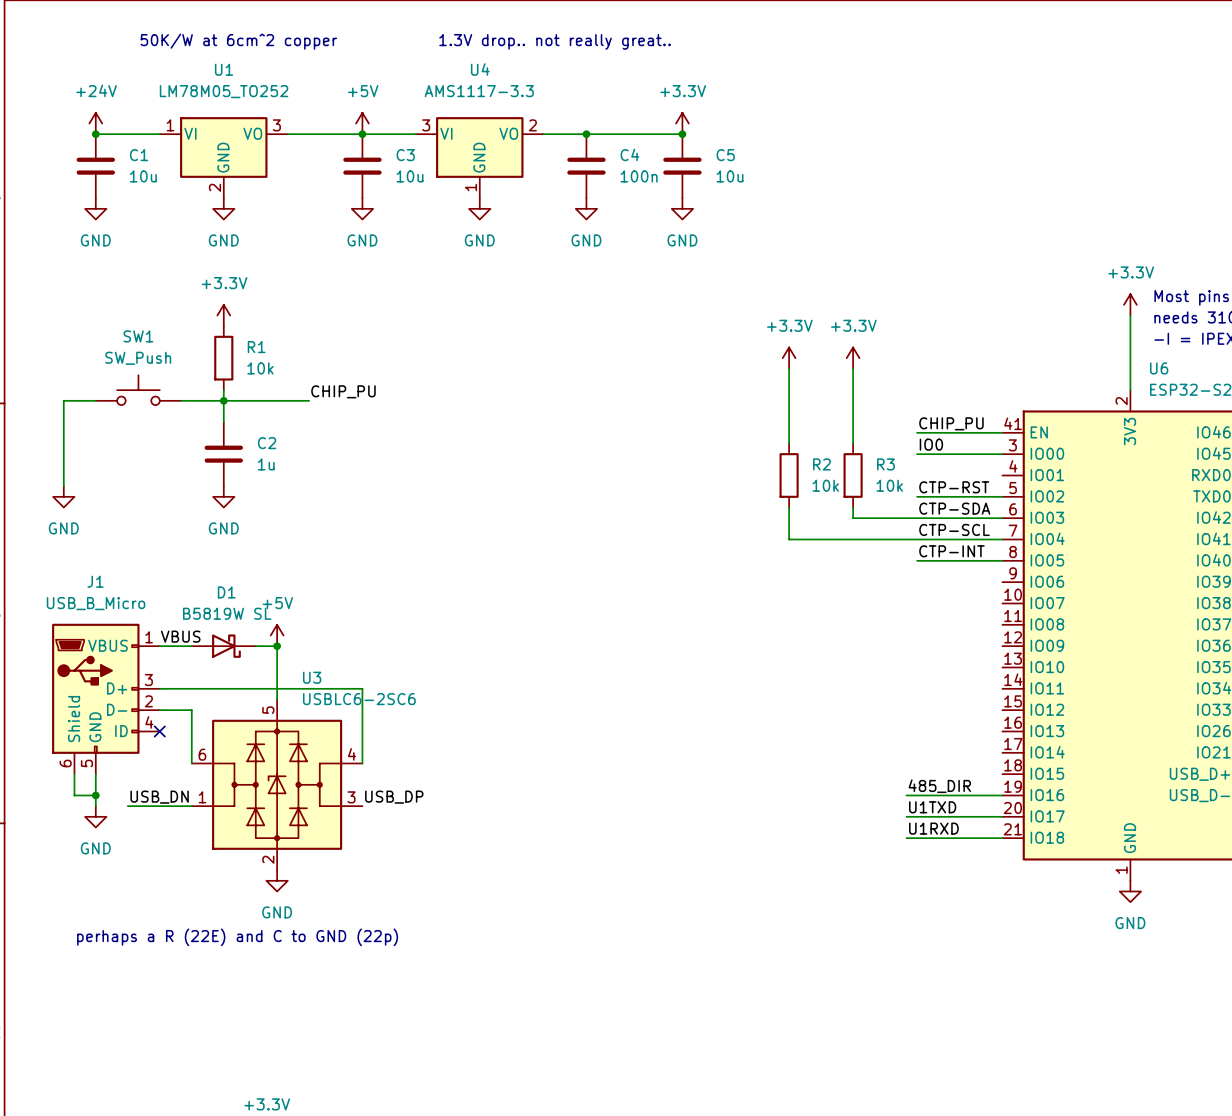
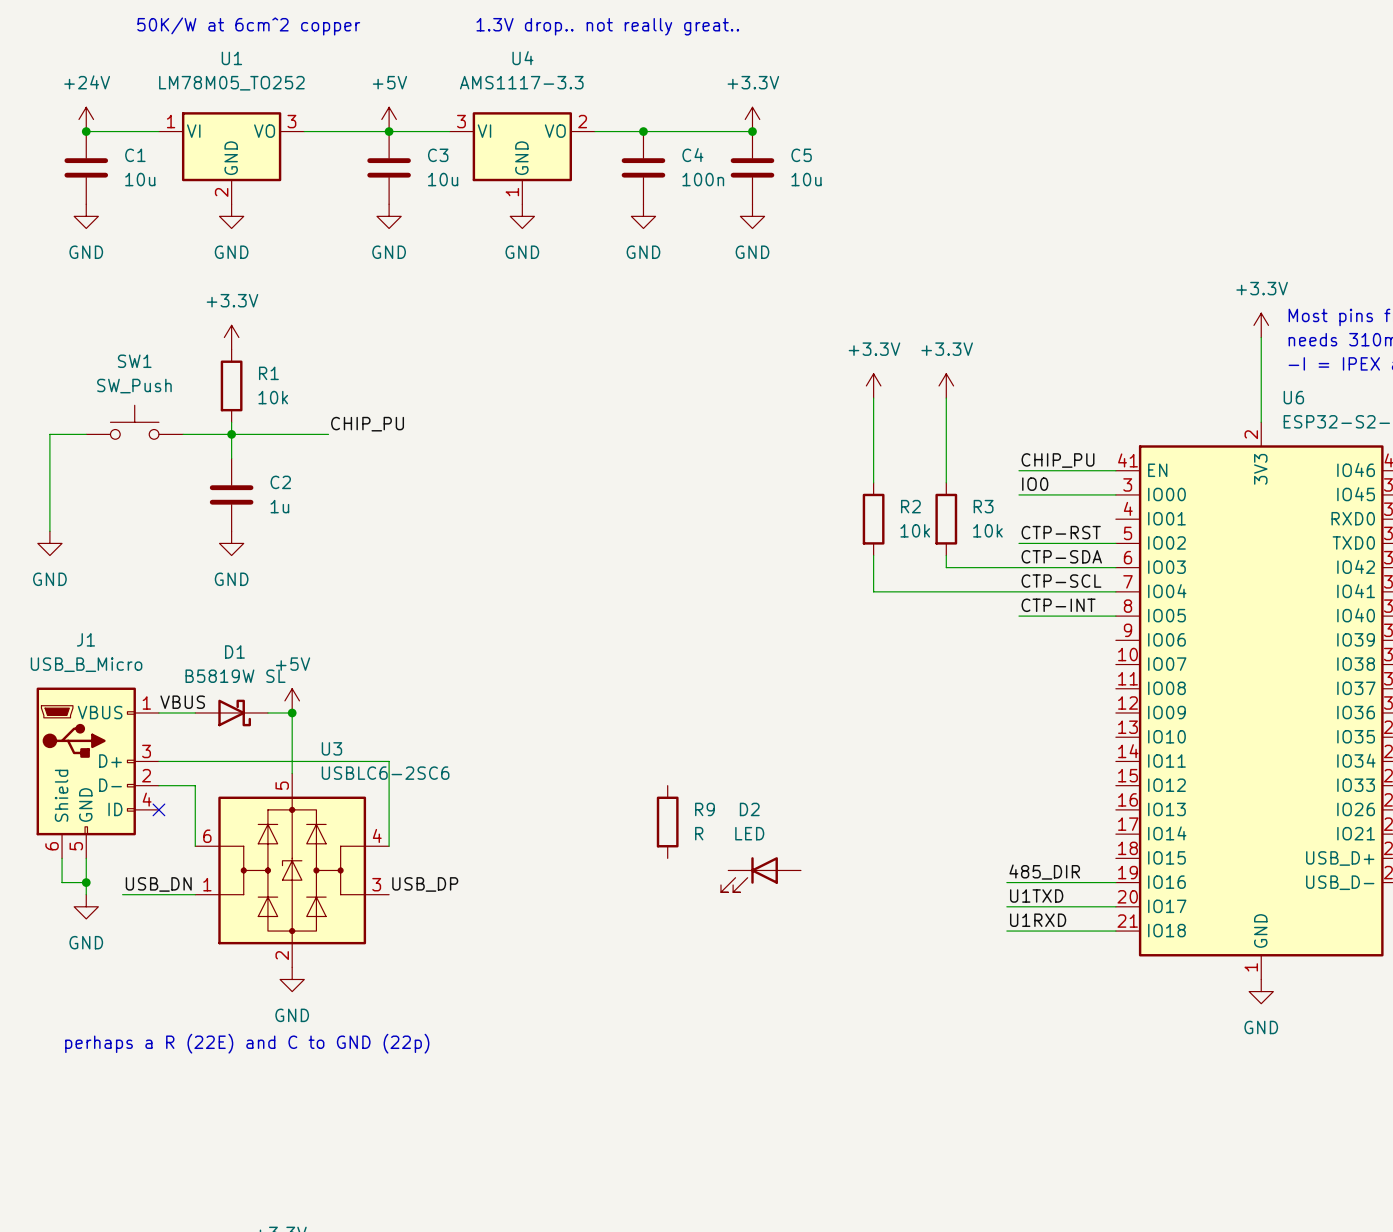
R9: none -> R (667, 822)
D2: none -> LED (760, 874)

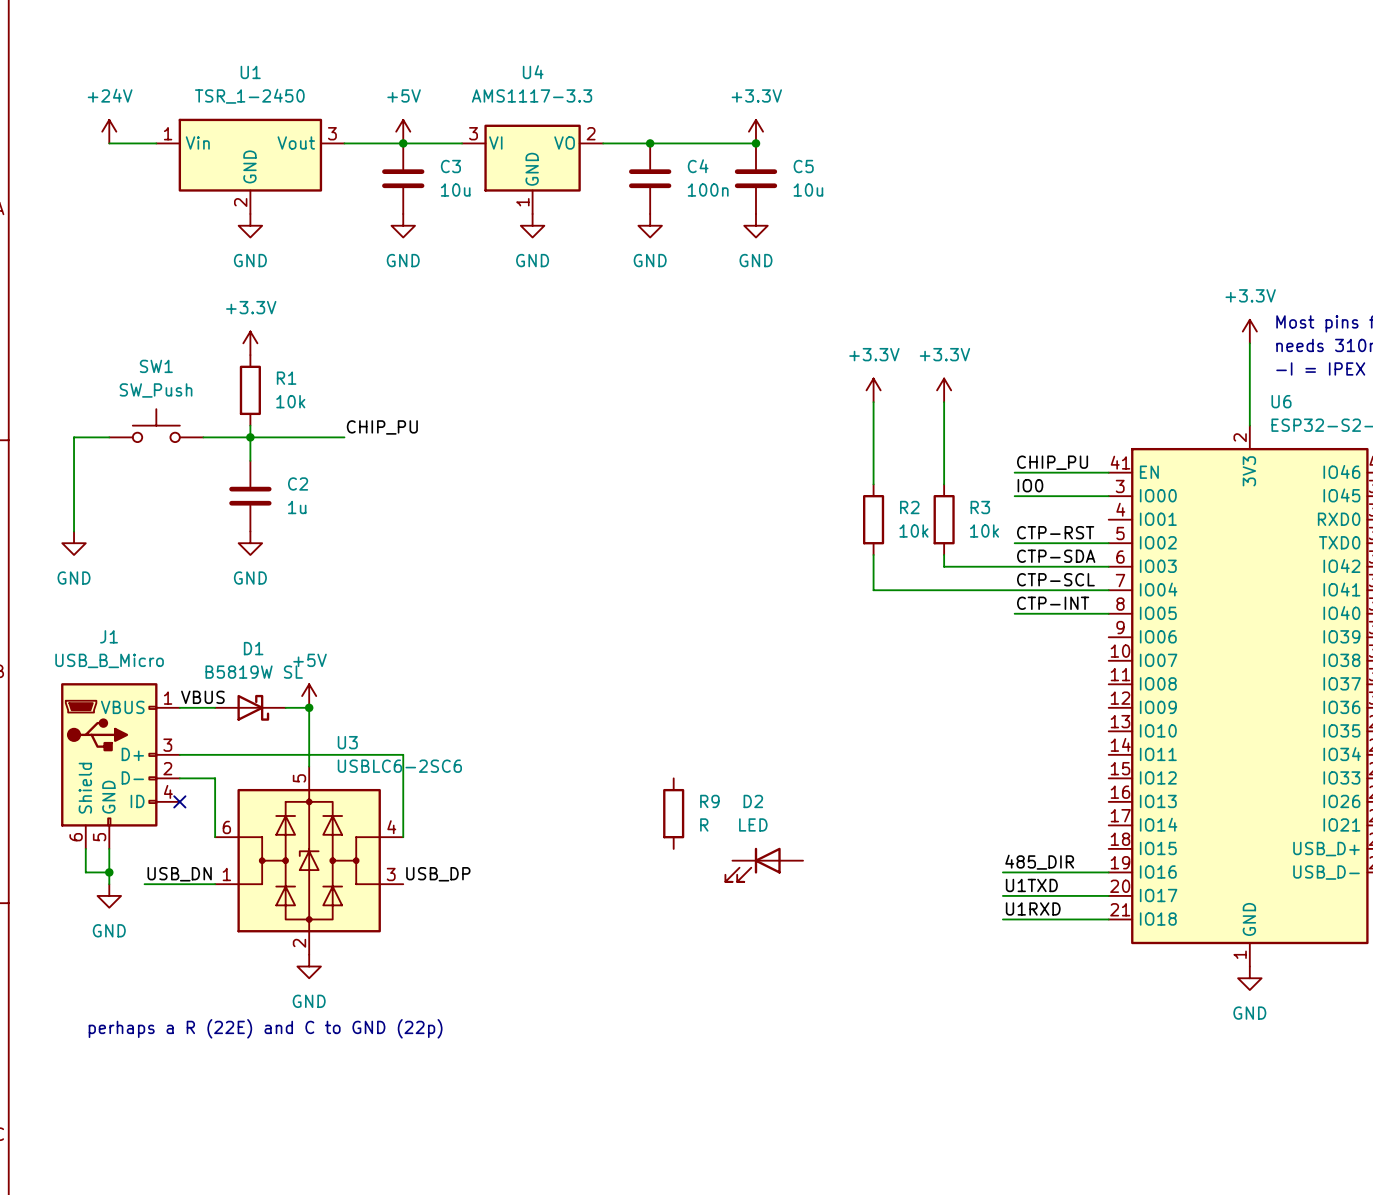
text: 50K/W at 6cm^2 copper (248, 26) -> none
text: 1.3V drop.. not really great.. (607, 26) -> none
U1 value: LM78M05_TO252 (231, 83) -> TSR_1-2450 (249, 96)
U1 symbol: [158, 112, 305, 205] -> [156, 118, 345, 214]
junction: (86, 131) -> none
C1: 10u (86, 167) -> none
power symbol: GND (86, 216) -> none

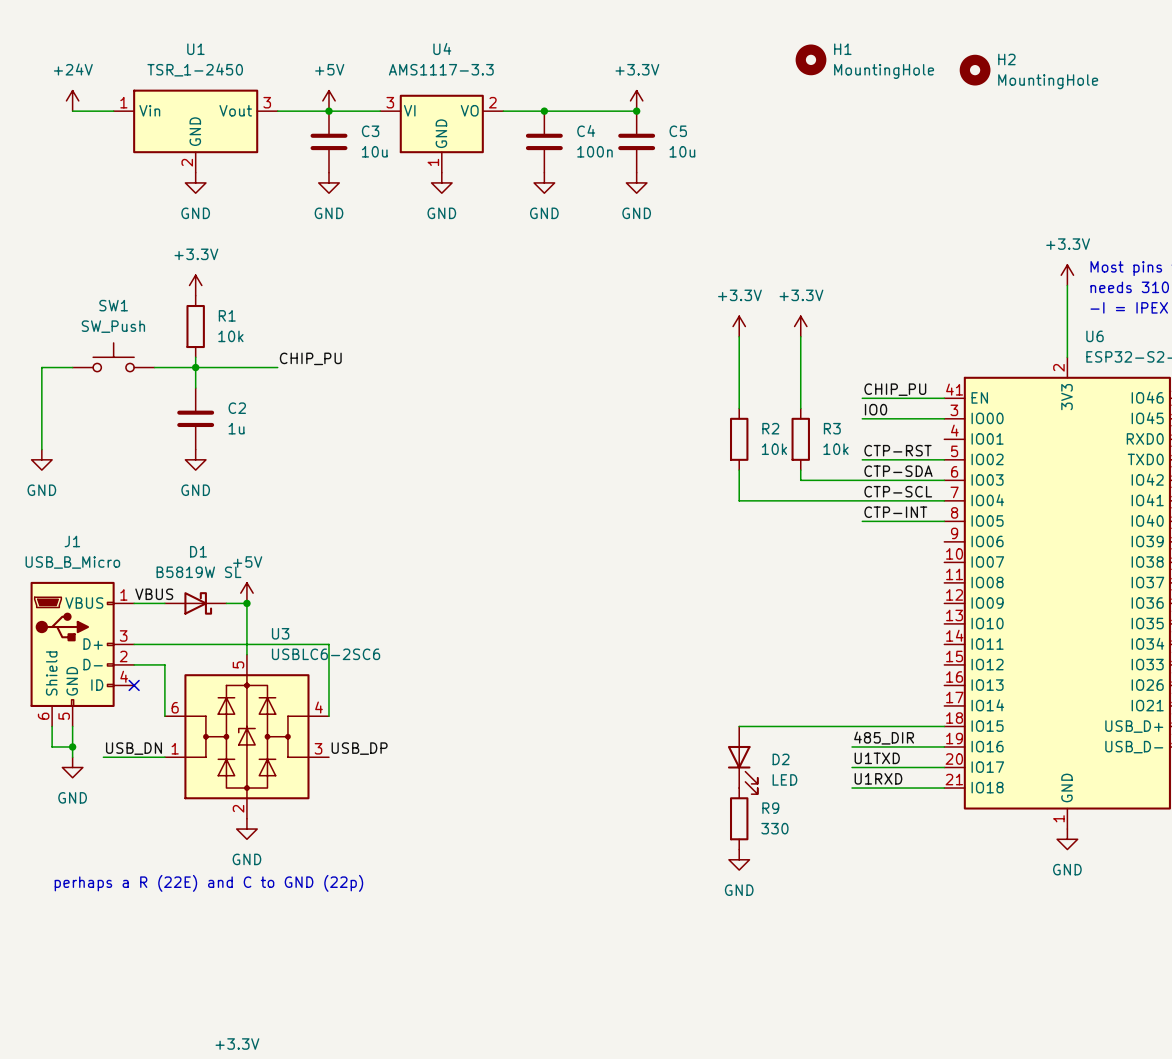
H1: none -> MountingHole (811, 59)
H2: none -> MountingHole (975, 70)
D2 name position: D2 (753, 801) -> D2 (781, 759)
R9 position: (673, 813) -> (739, 818)
R9 value: R (704, 824) -> 330 (774, 828)
D2 value position: LED (753, 824) -> LED (784, 779)
wire: none -> (739, 726) (944, 726)
D2 rotation: 0° (753, 864) -> 90° counterclockwise (742, 770)
D2 position: (764, 864) -> (742, 760)
power symbol: none -> GND (739, 859)

